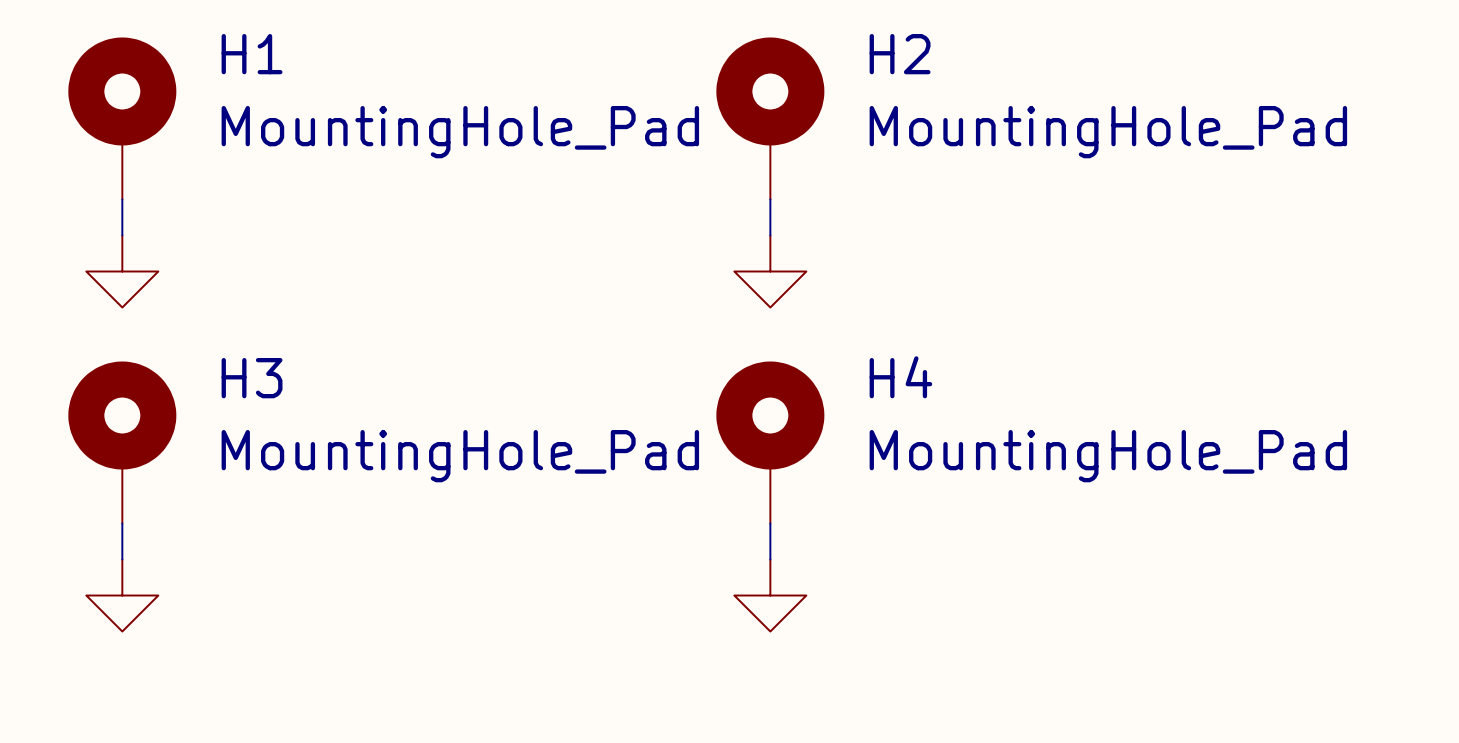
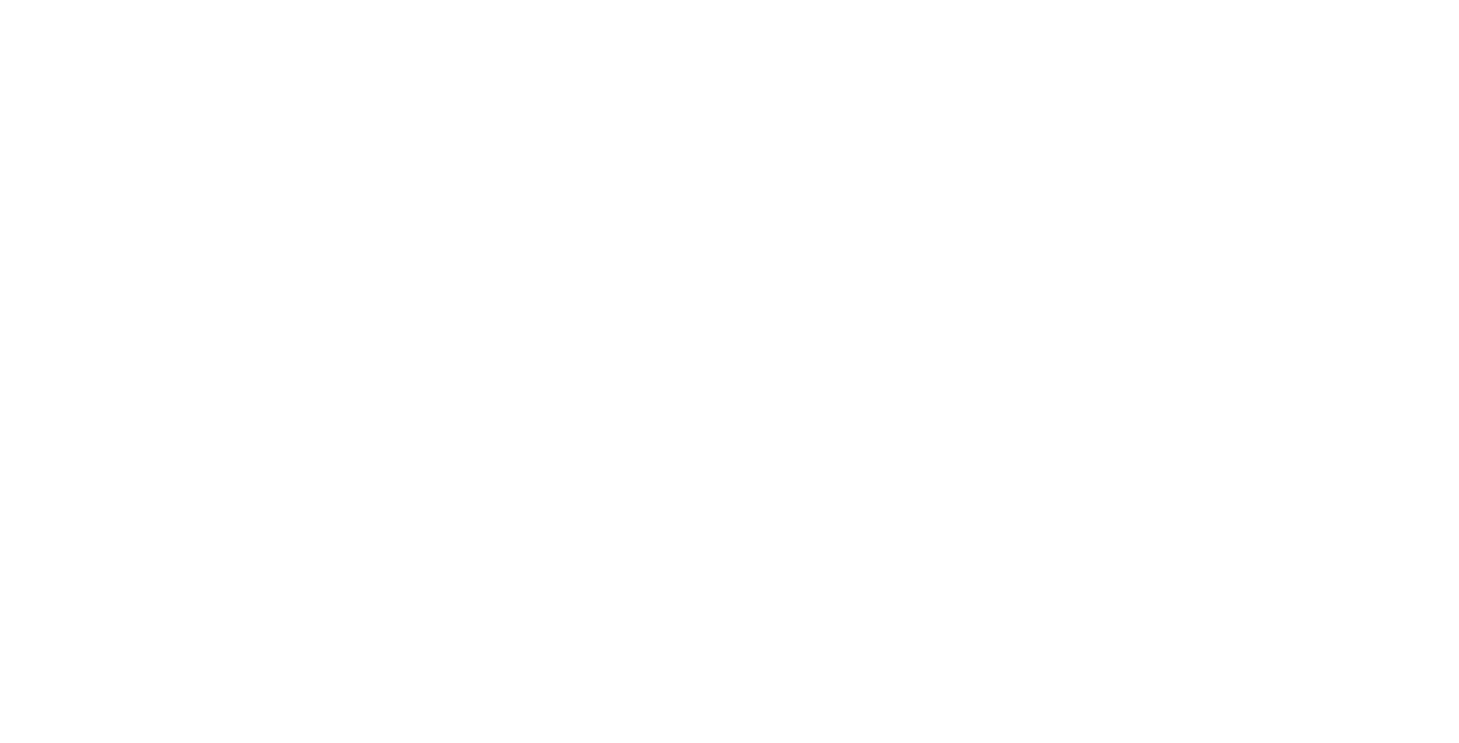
H1: MountingHole_Pad (122, 118) -> none
H2: MountingHole_Pad (770, 118) -> none
wire: (122, 199) (122, 235) -> none
wire: (770, 199) (770, 235) -> none
power symbol: (122, 271) -> none
power symbol: (770, 271) -> none
H3: MountingHole_Pad (122, 442) -> none
H4: MountingHole_Pad (770, 442) -> none
wire: (122, 523) (122, 559) -> none
wire: (770, 523) (770, 559) -> none
power symbol: (122, 595) -> none
power symbol: (770, 595) -> none

